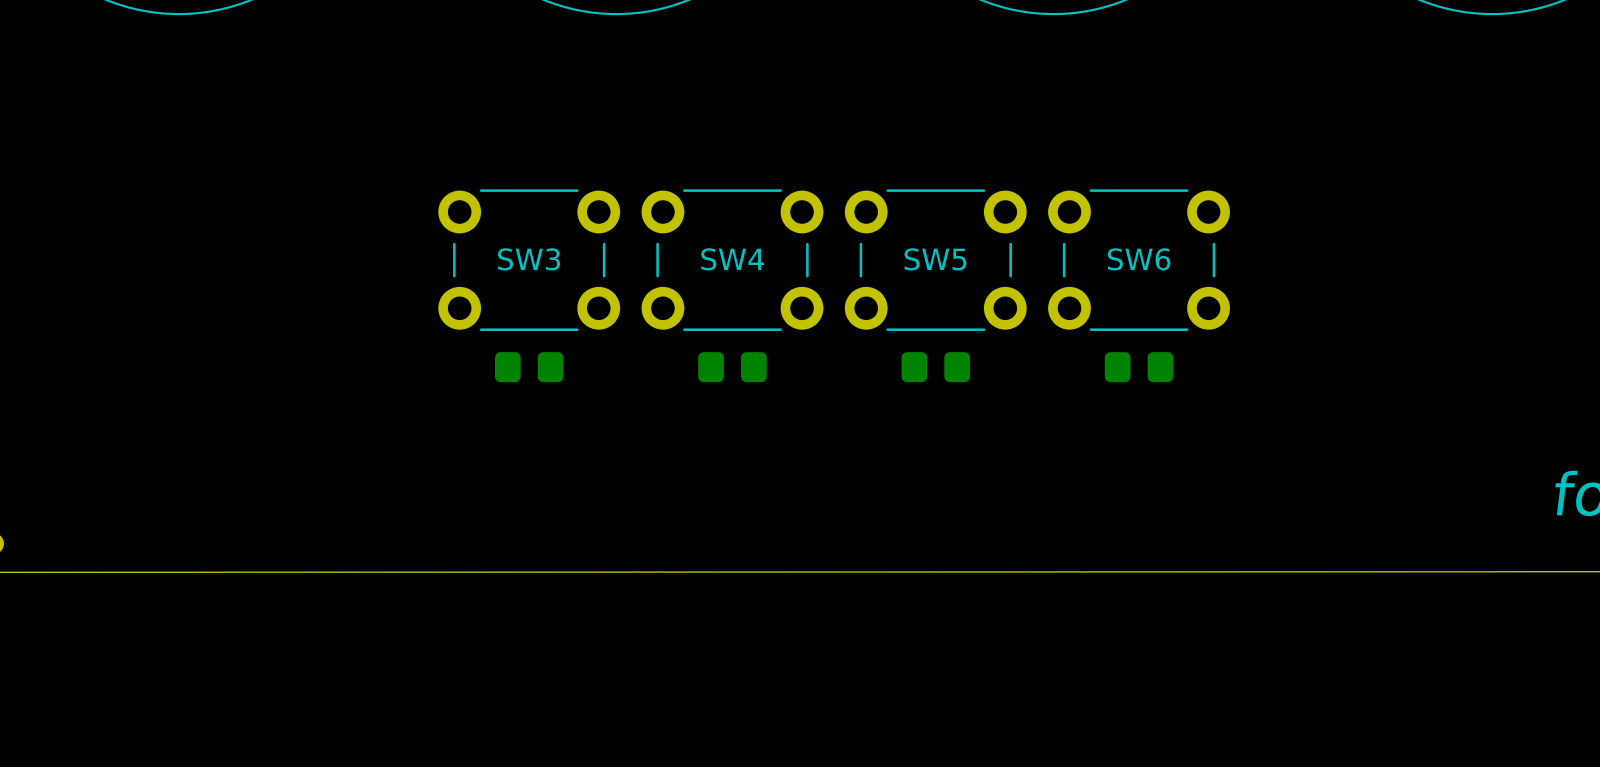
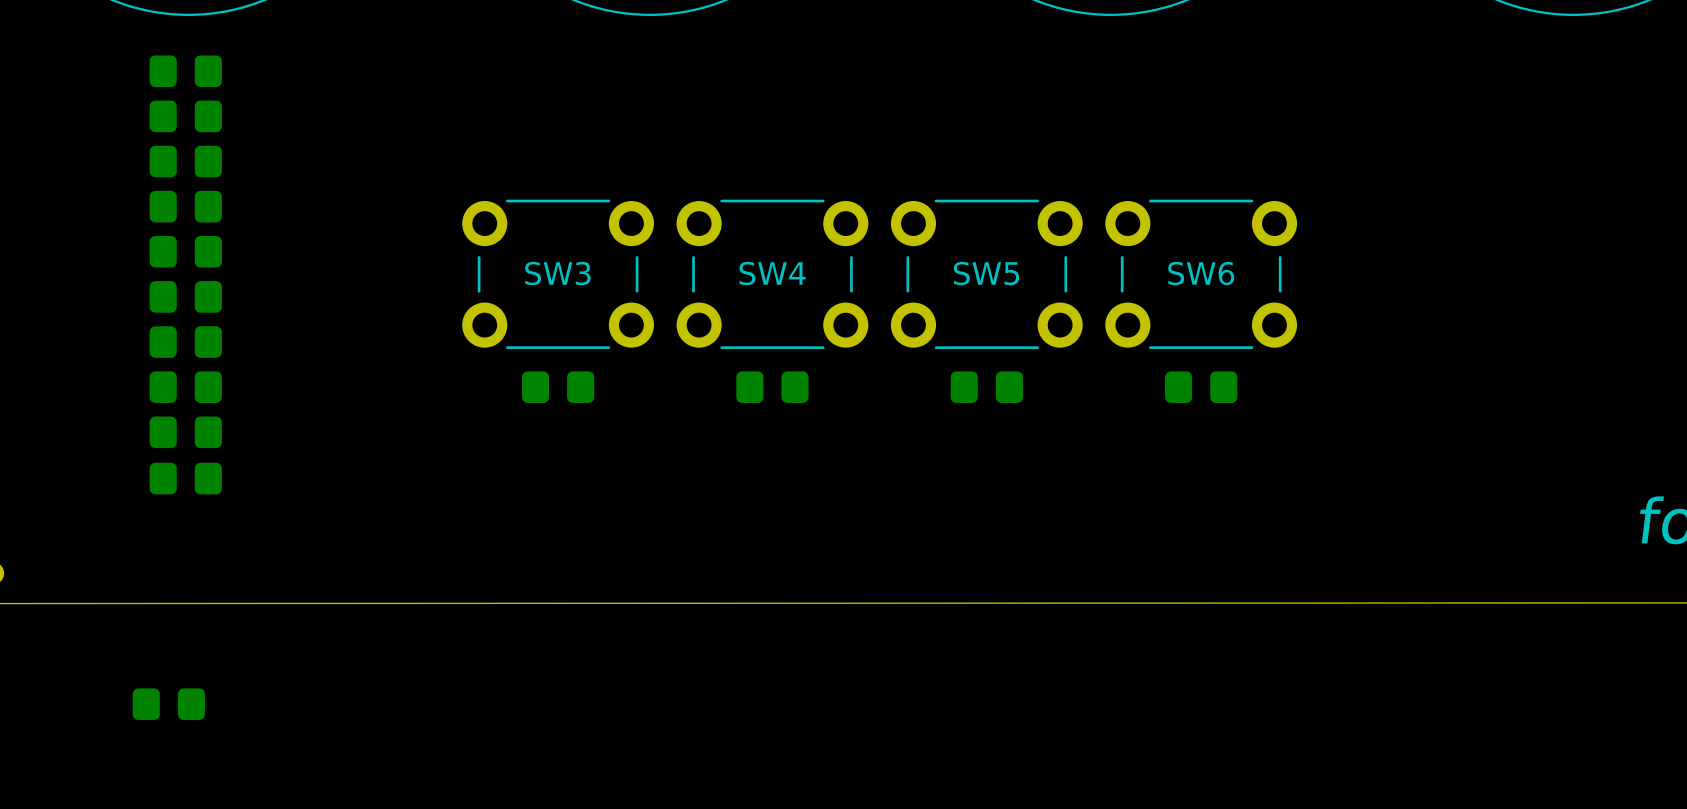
part: none -> (185, 71)
part: none -> (185, 116)
part: none -> (185, 161)
part: none -> (185, 206)
part: none -> (185, 251)
part: none -> (185, 296)
part: none -> (185, 342)
part: none -> (185, 387)
part: none -> (185, 432)
part: none -> (185, 478)
part: none -> (168, 704)

